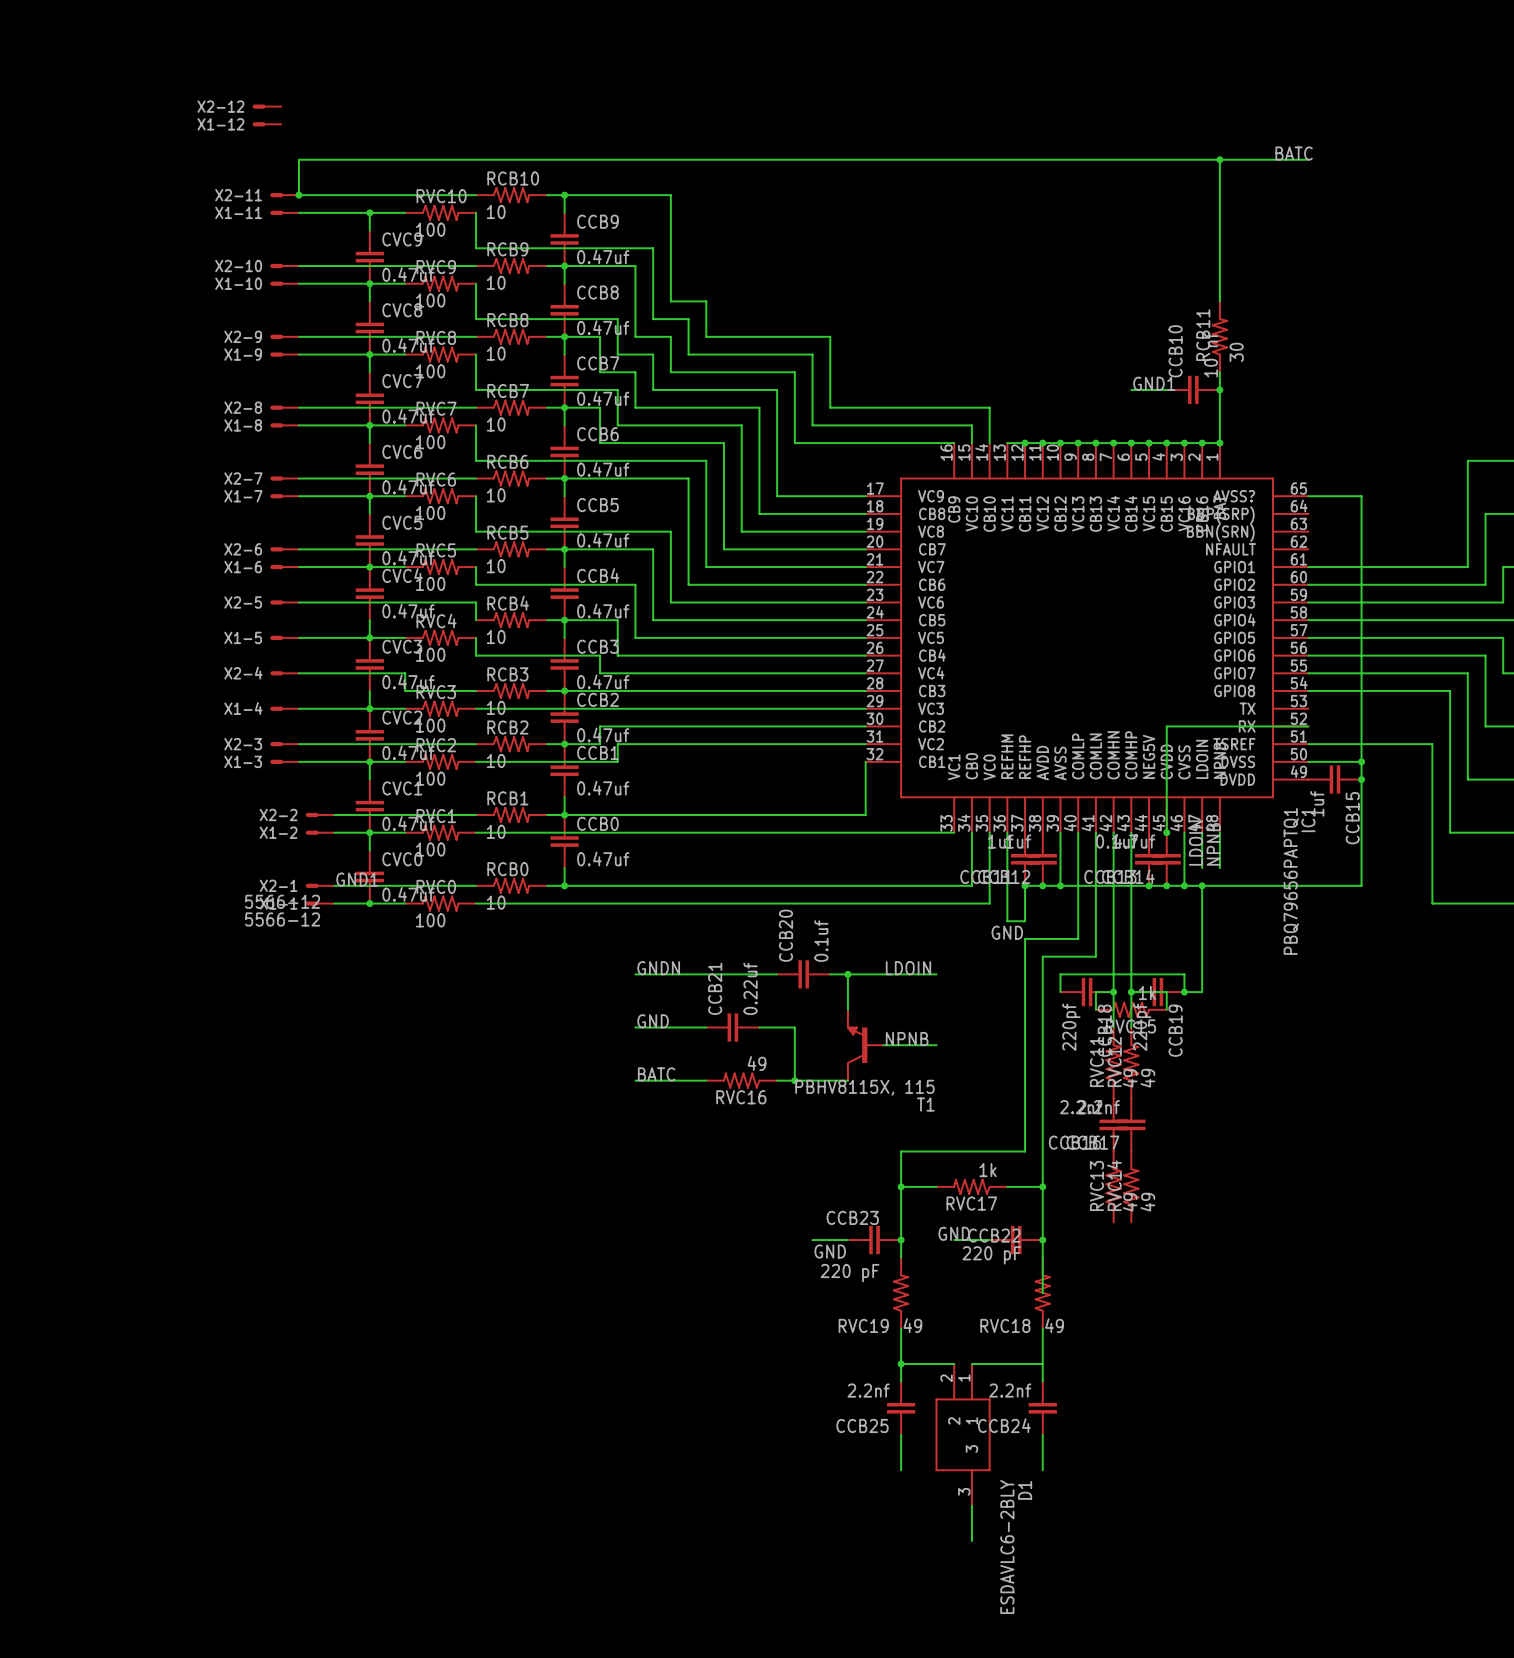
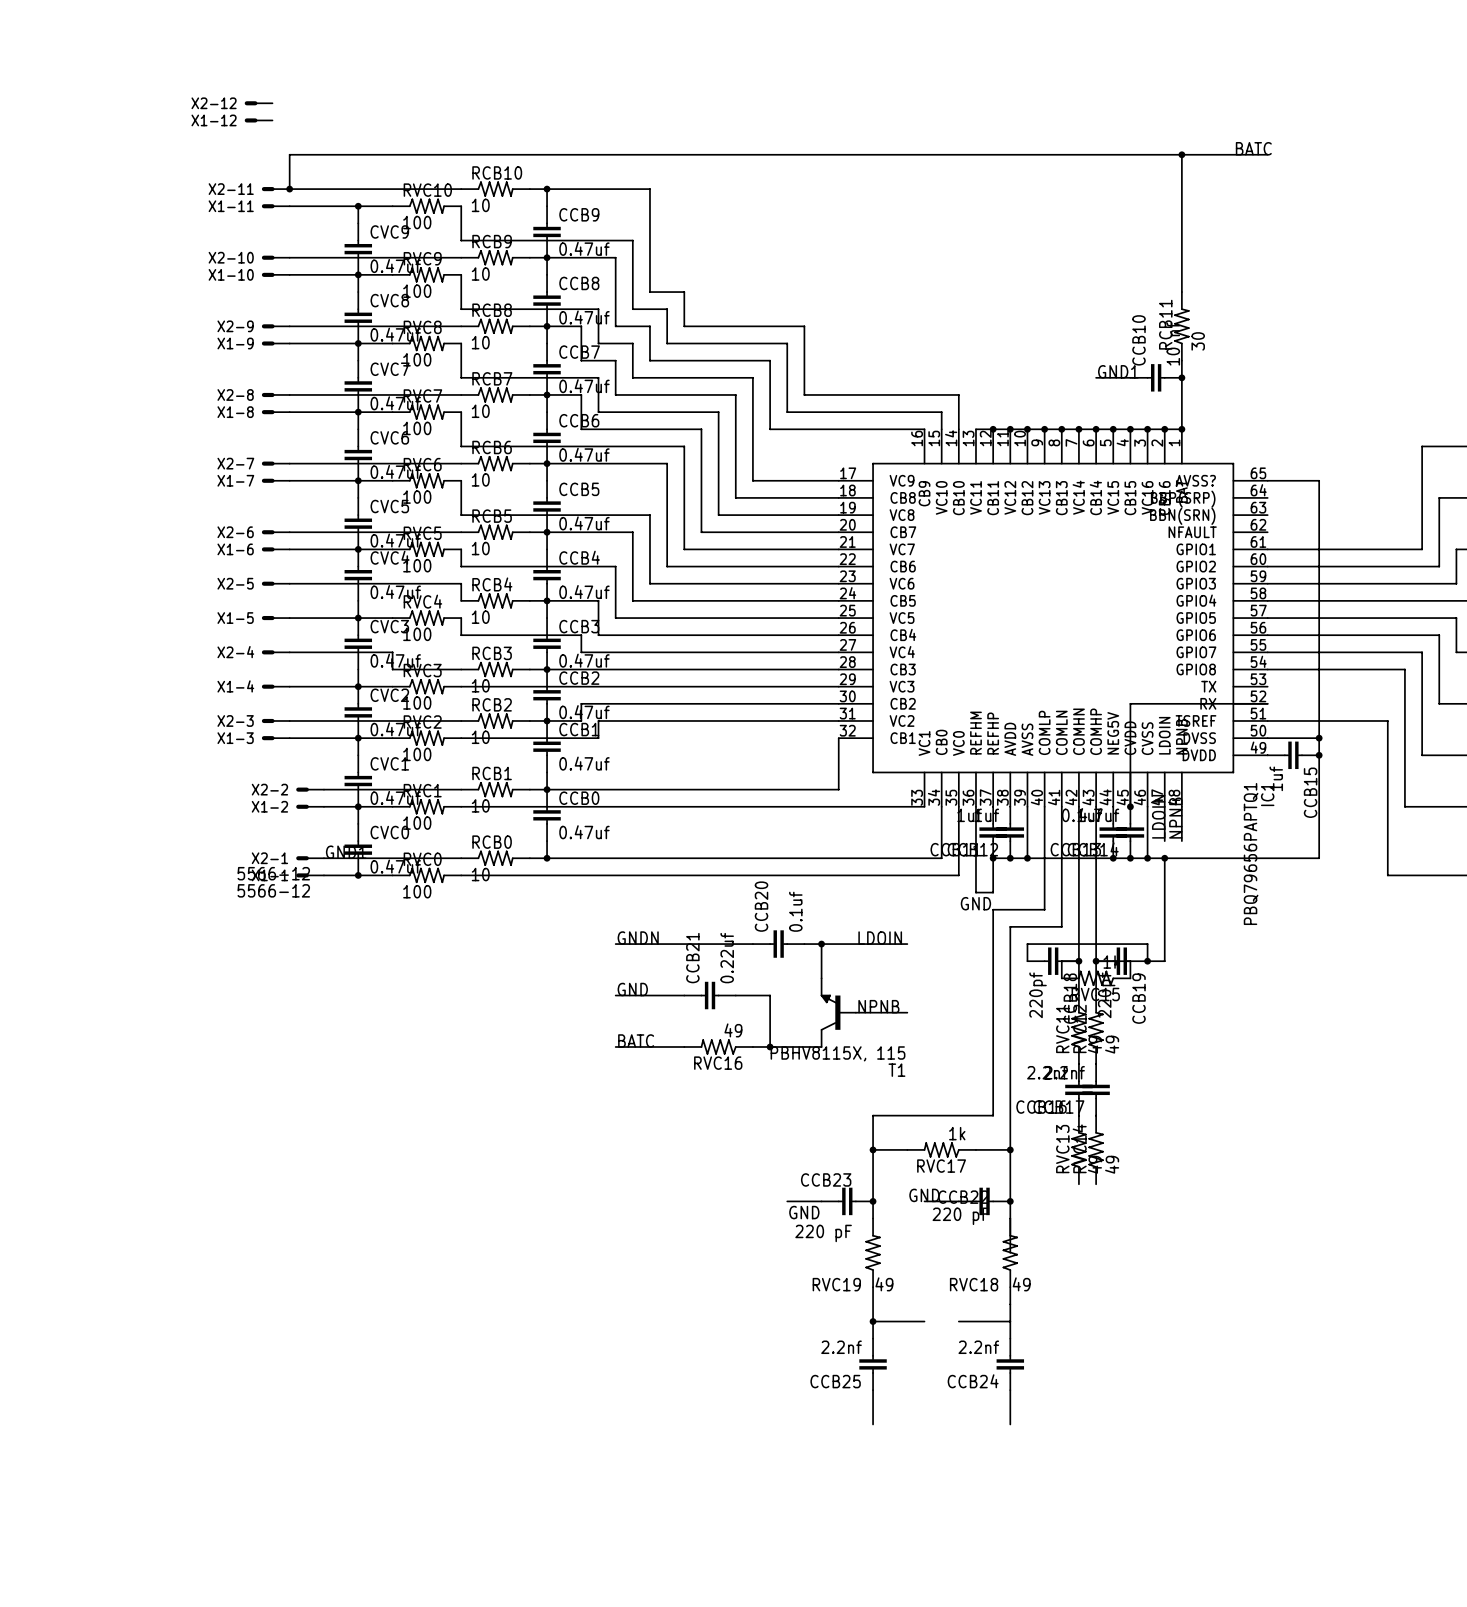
wire: (971, 1363) (989, 1363) -> none
D1: ESDAVLC6-2BLY (963, 1434) -> none
wire: (971, 1505) (971, 1541) -> none

